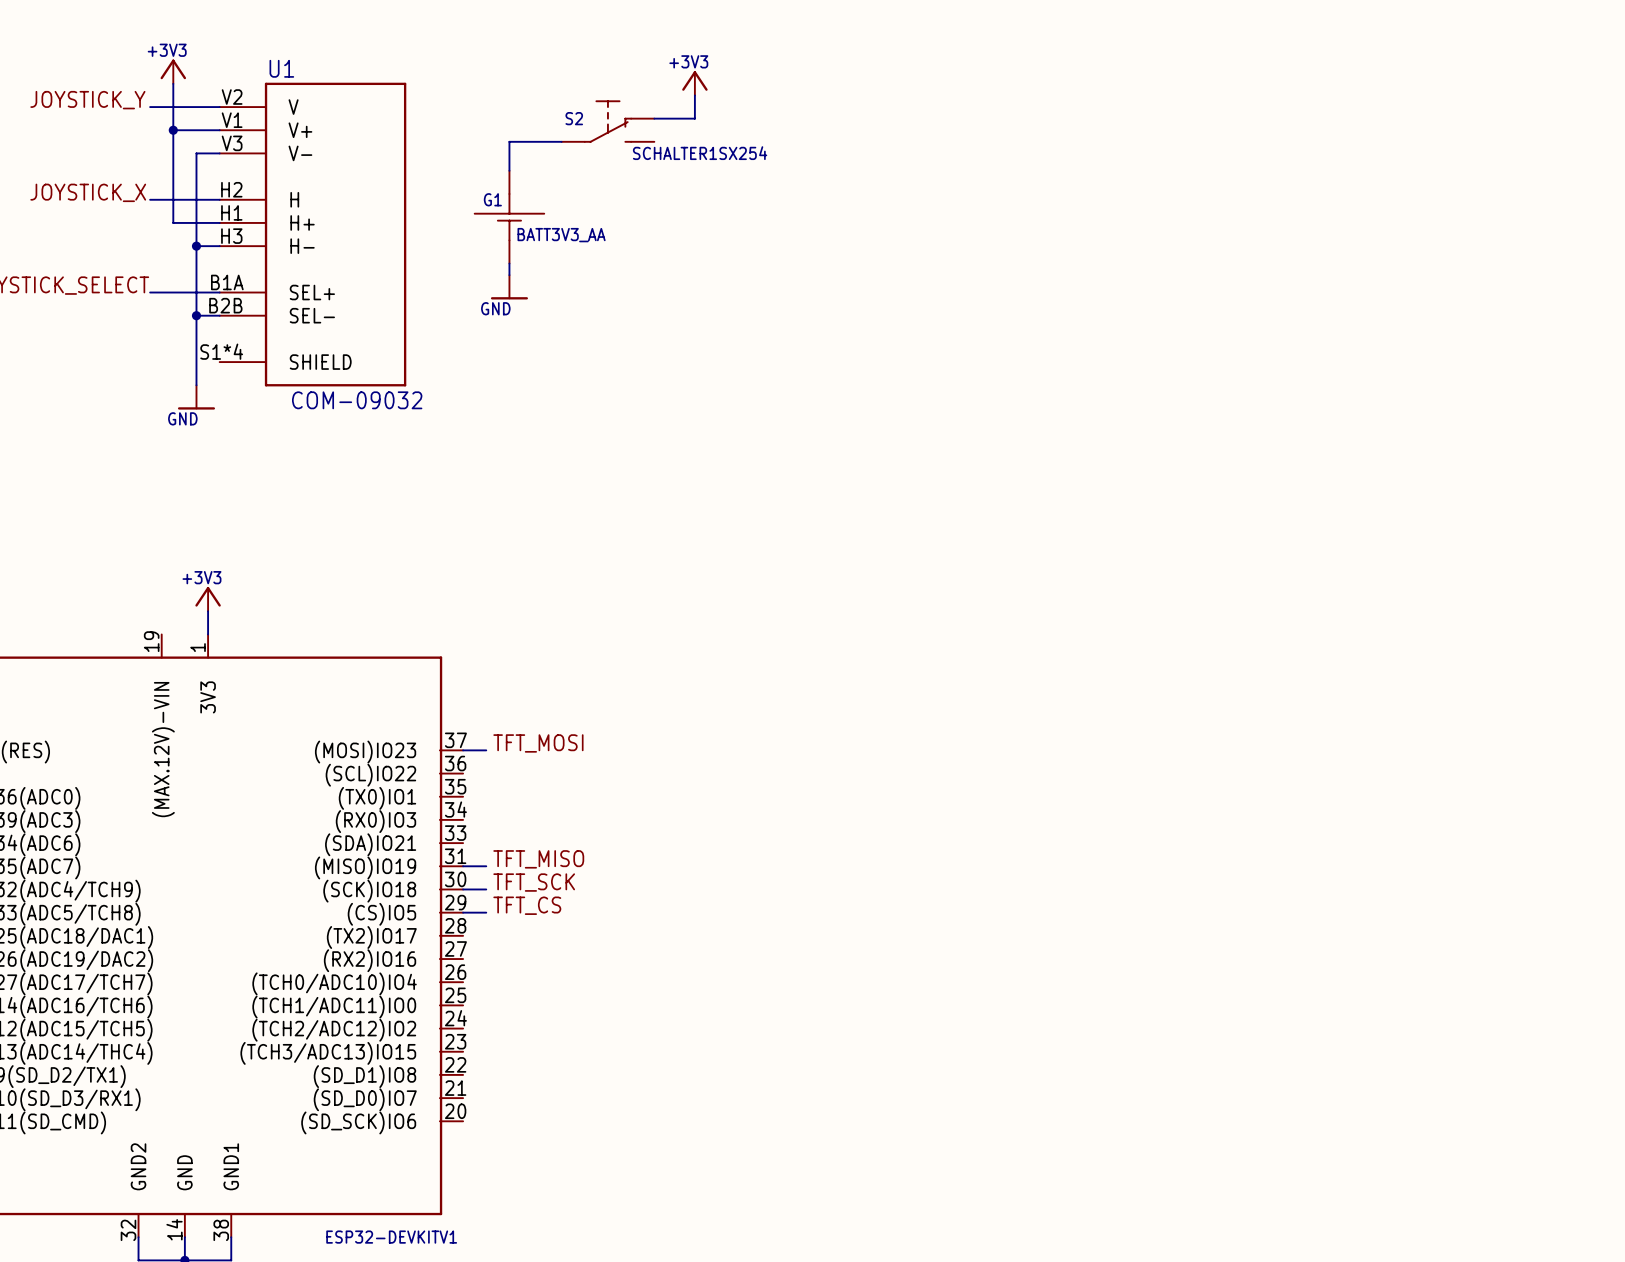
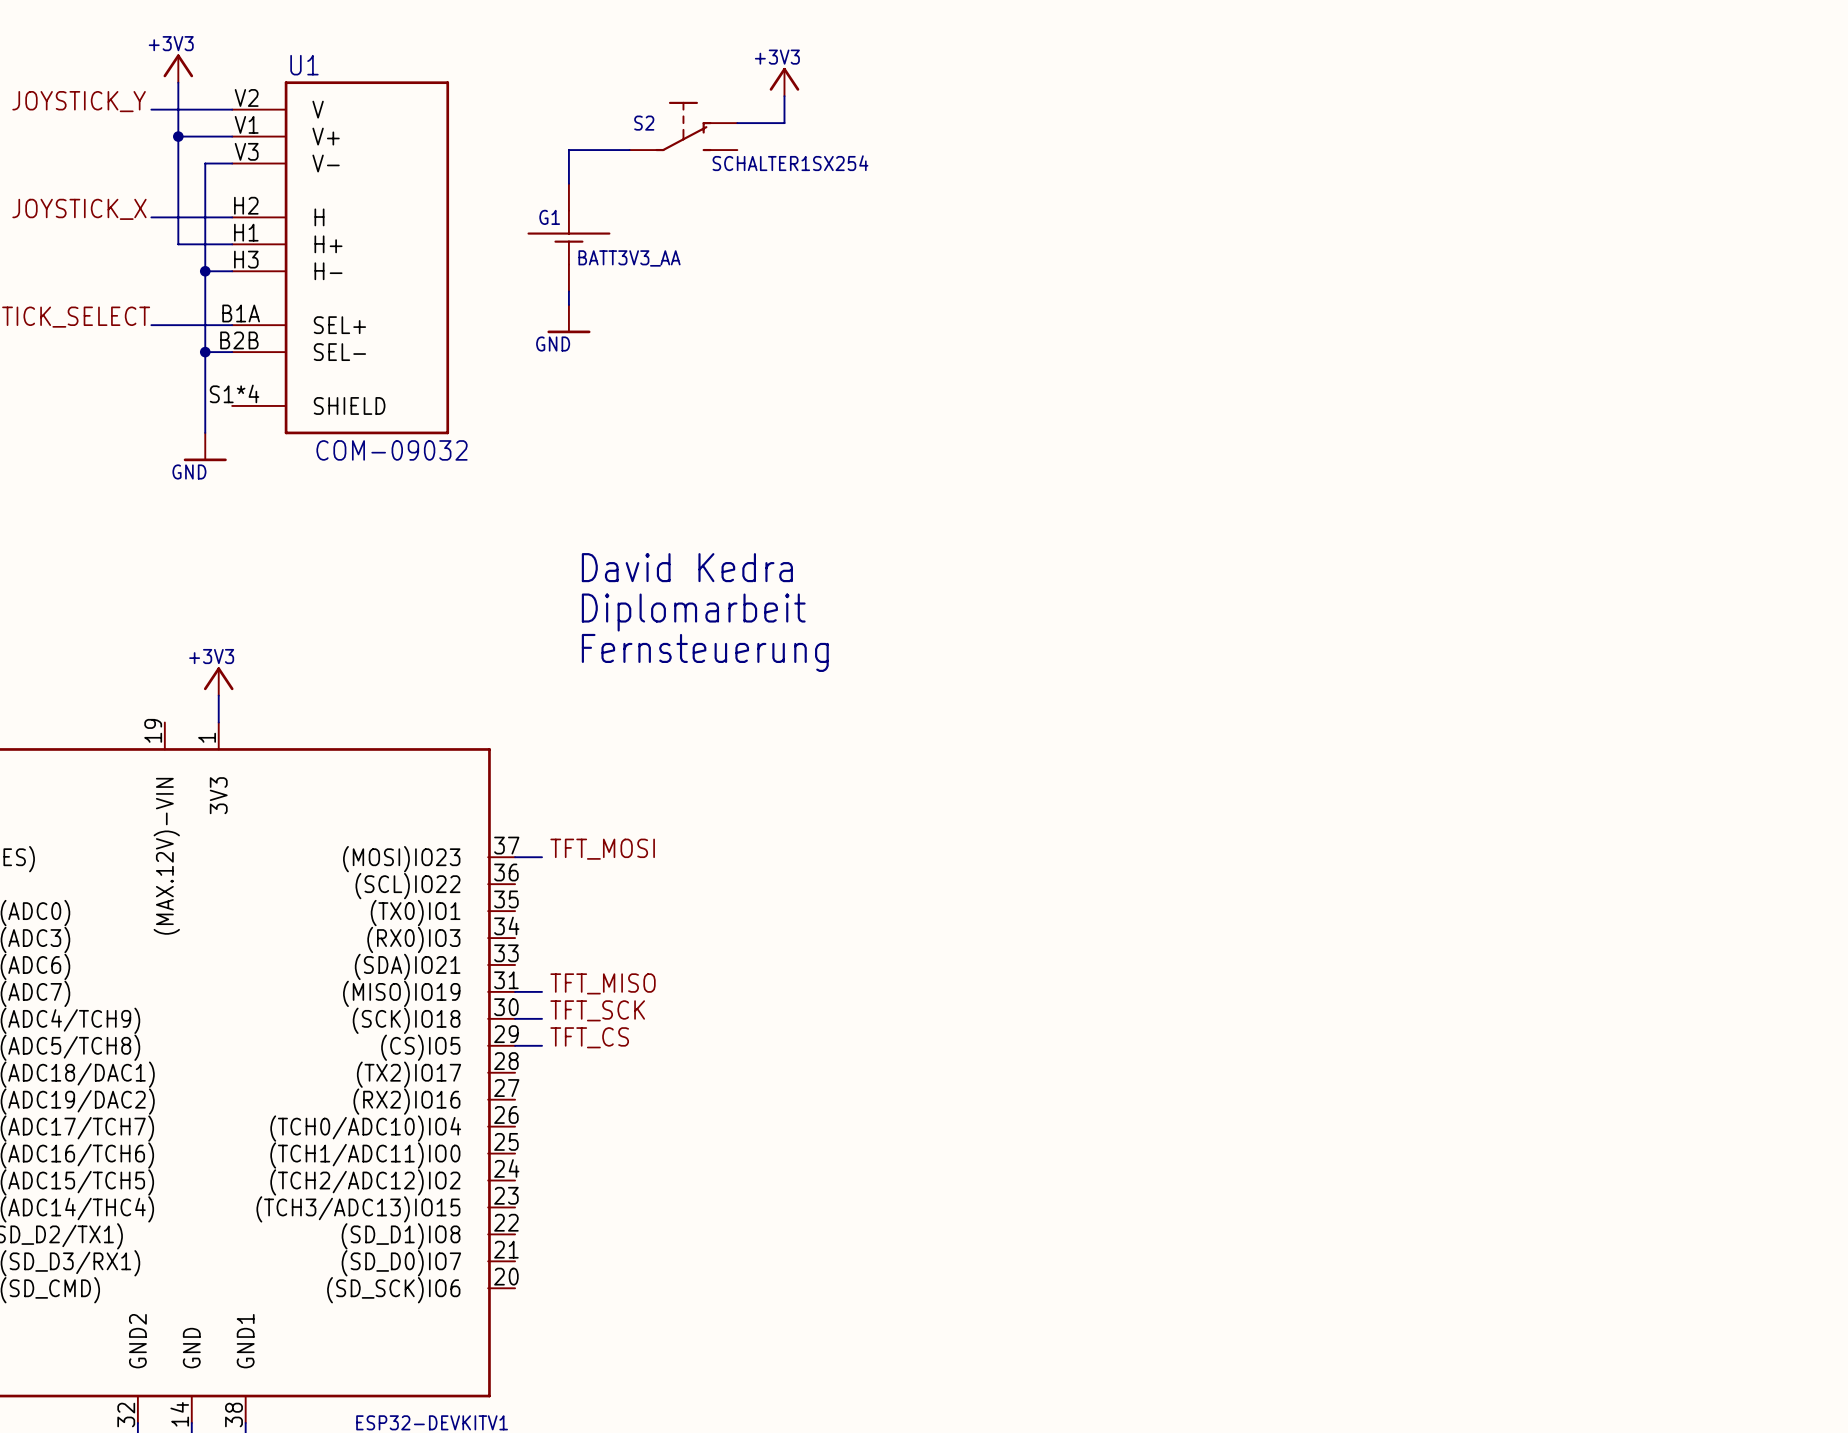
text: none -> David Kedra (687, 567)
text: none -> Diplomarbeit (693, 612)
text: none -> Fernsteuerung (705, 652)

